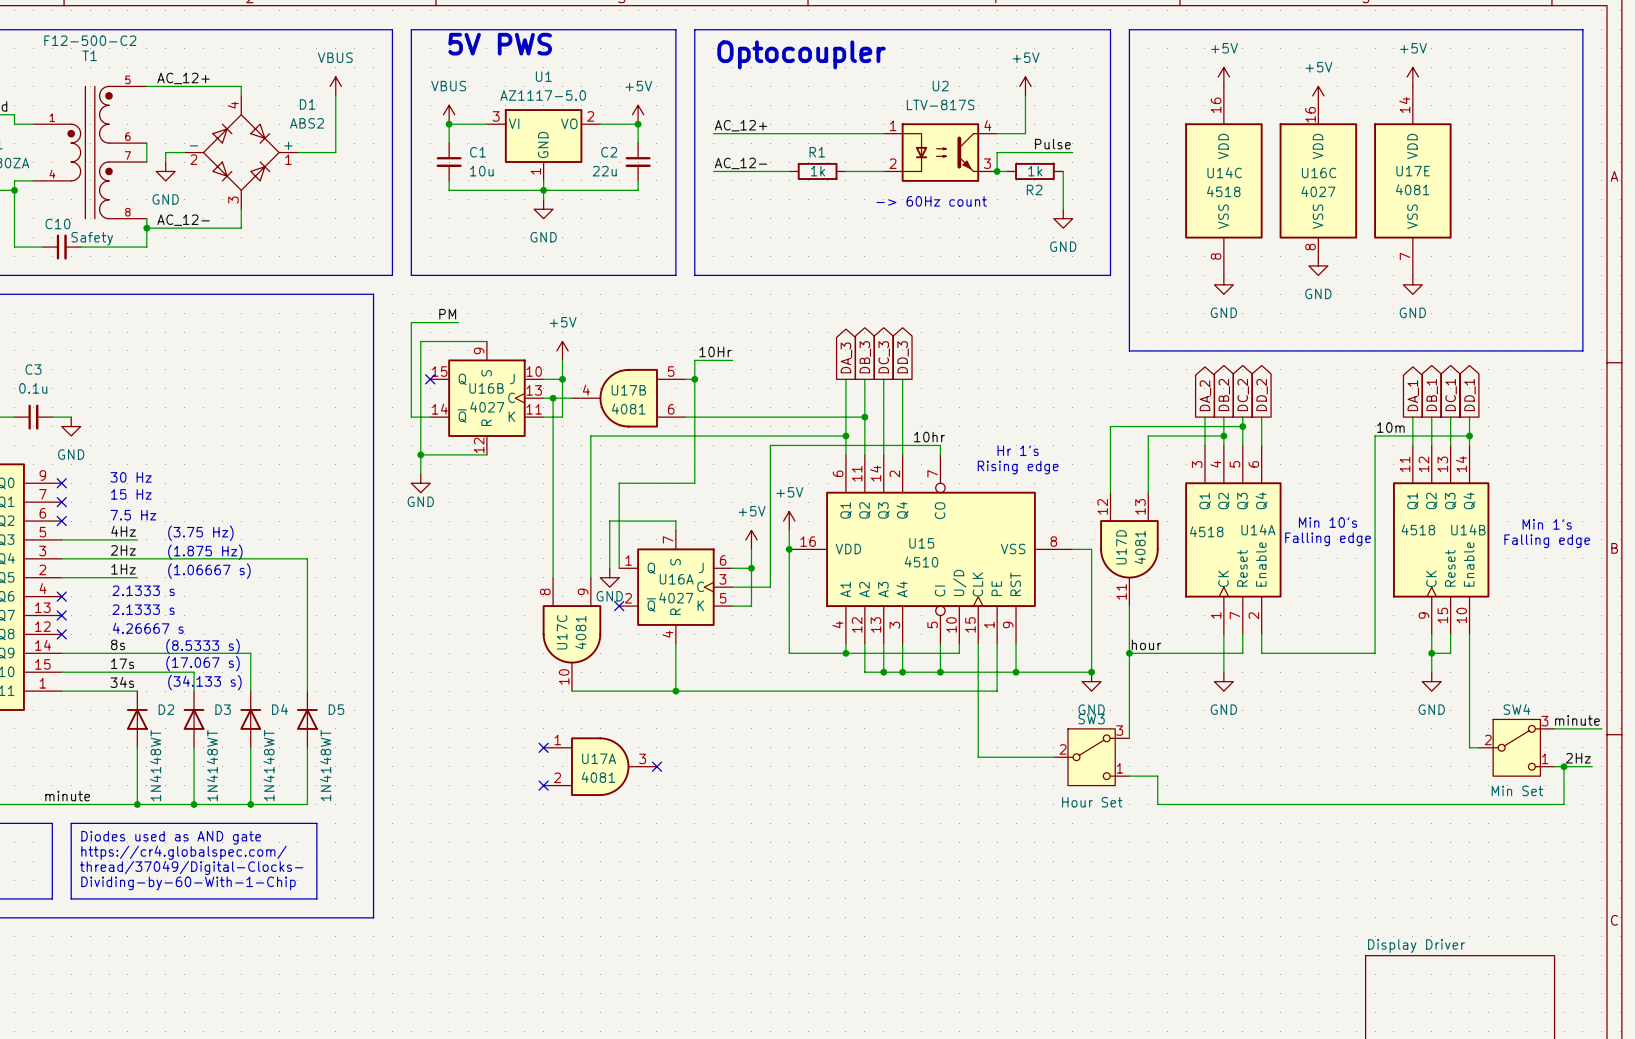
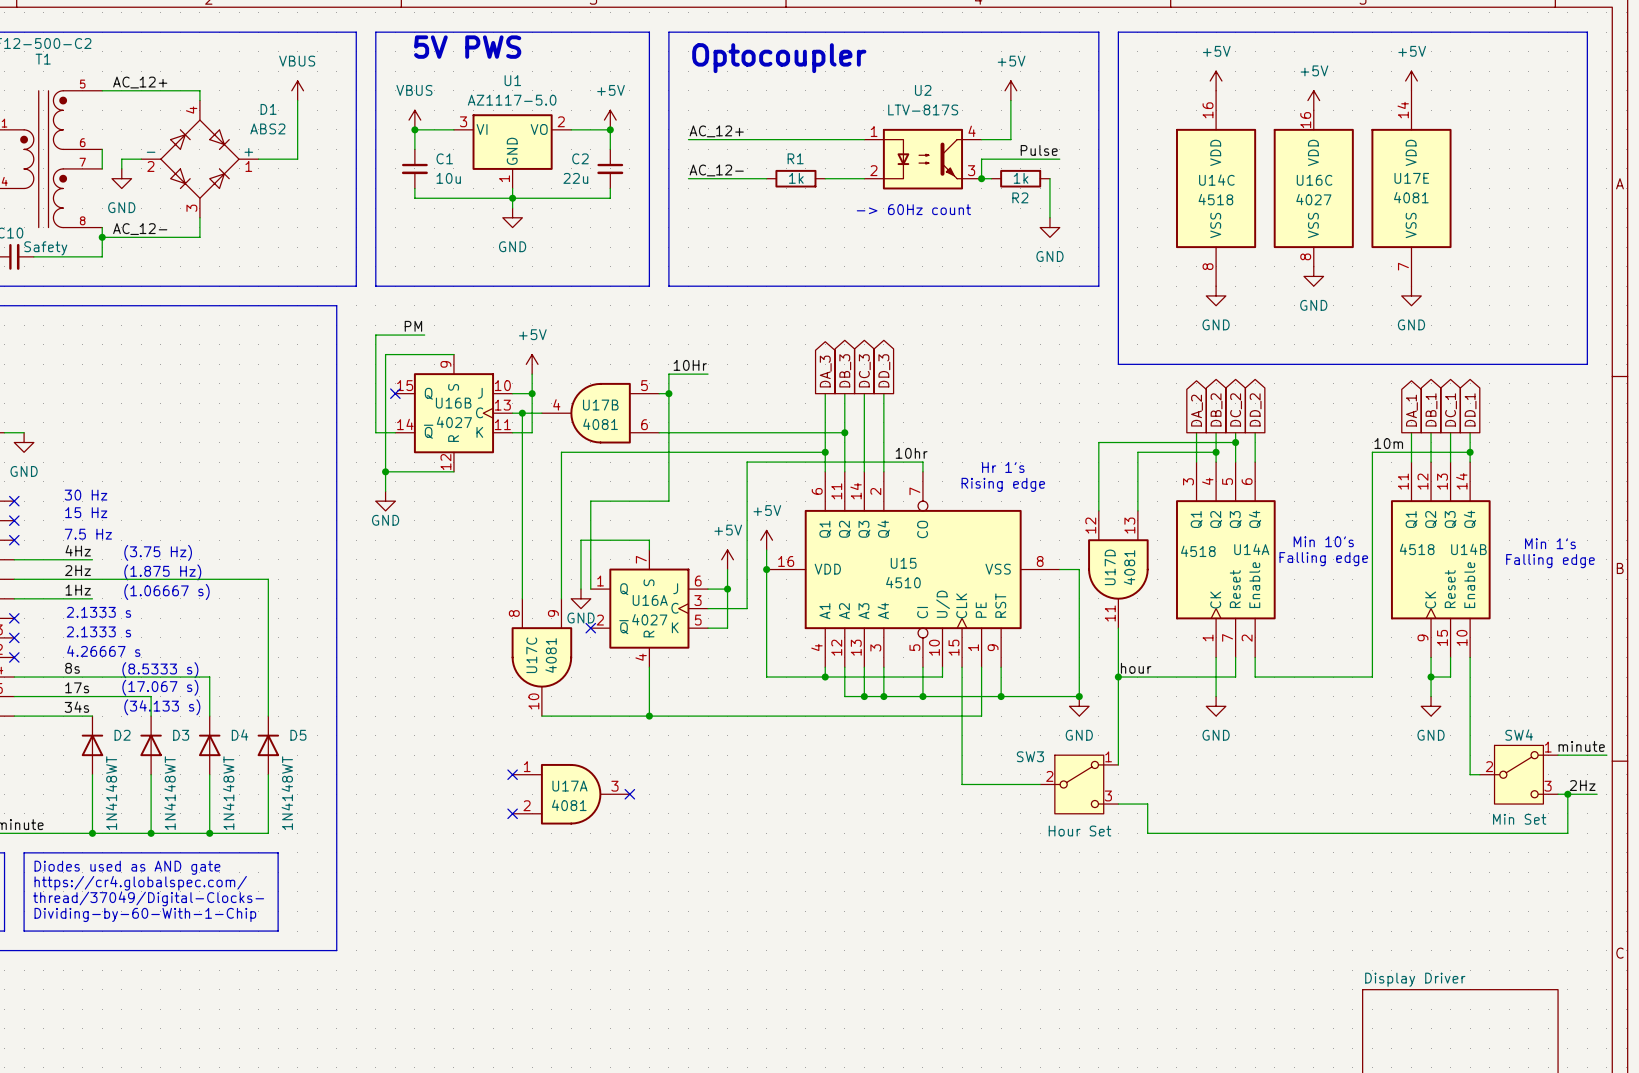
SW3 name position: SW3 (1091, 719) -> SW3 (1030, 756)
SW4 pin number: 3 (1544, 721) -> 1 (1548, 747)
SW3 pin number: 3 (1119, 730) -> 1 (1108, 756)
SW4 pin number: 1 (1545, 758) -> 3 (1548, 786)
SW3 pin number: 1 (1119, 768) -> 3 (1108, 795)

